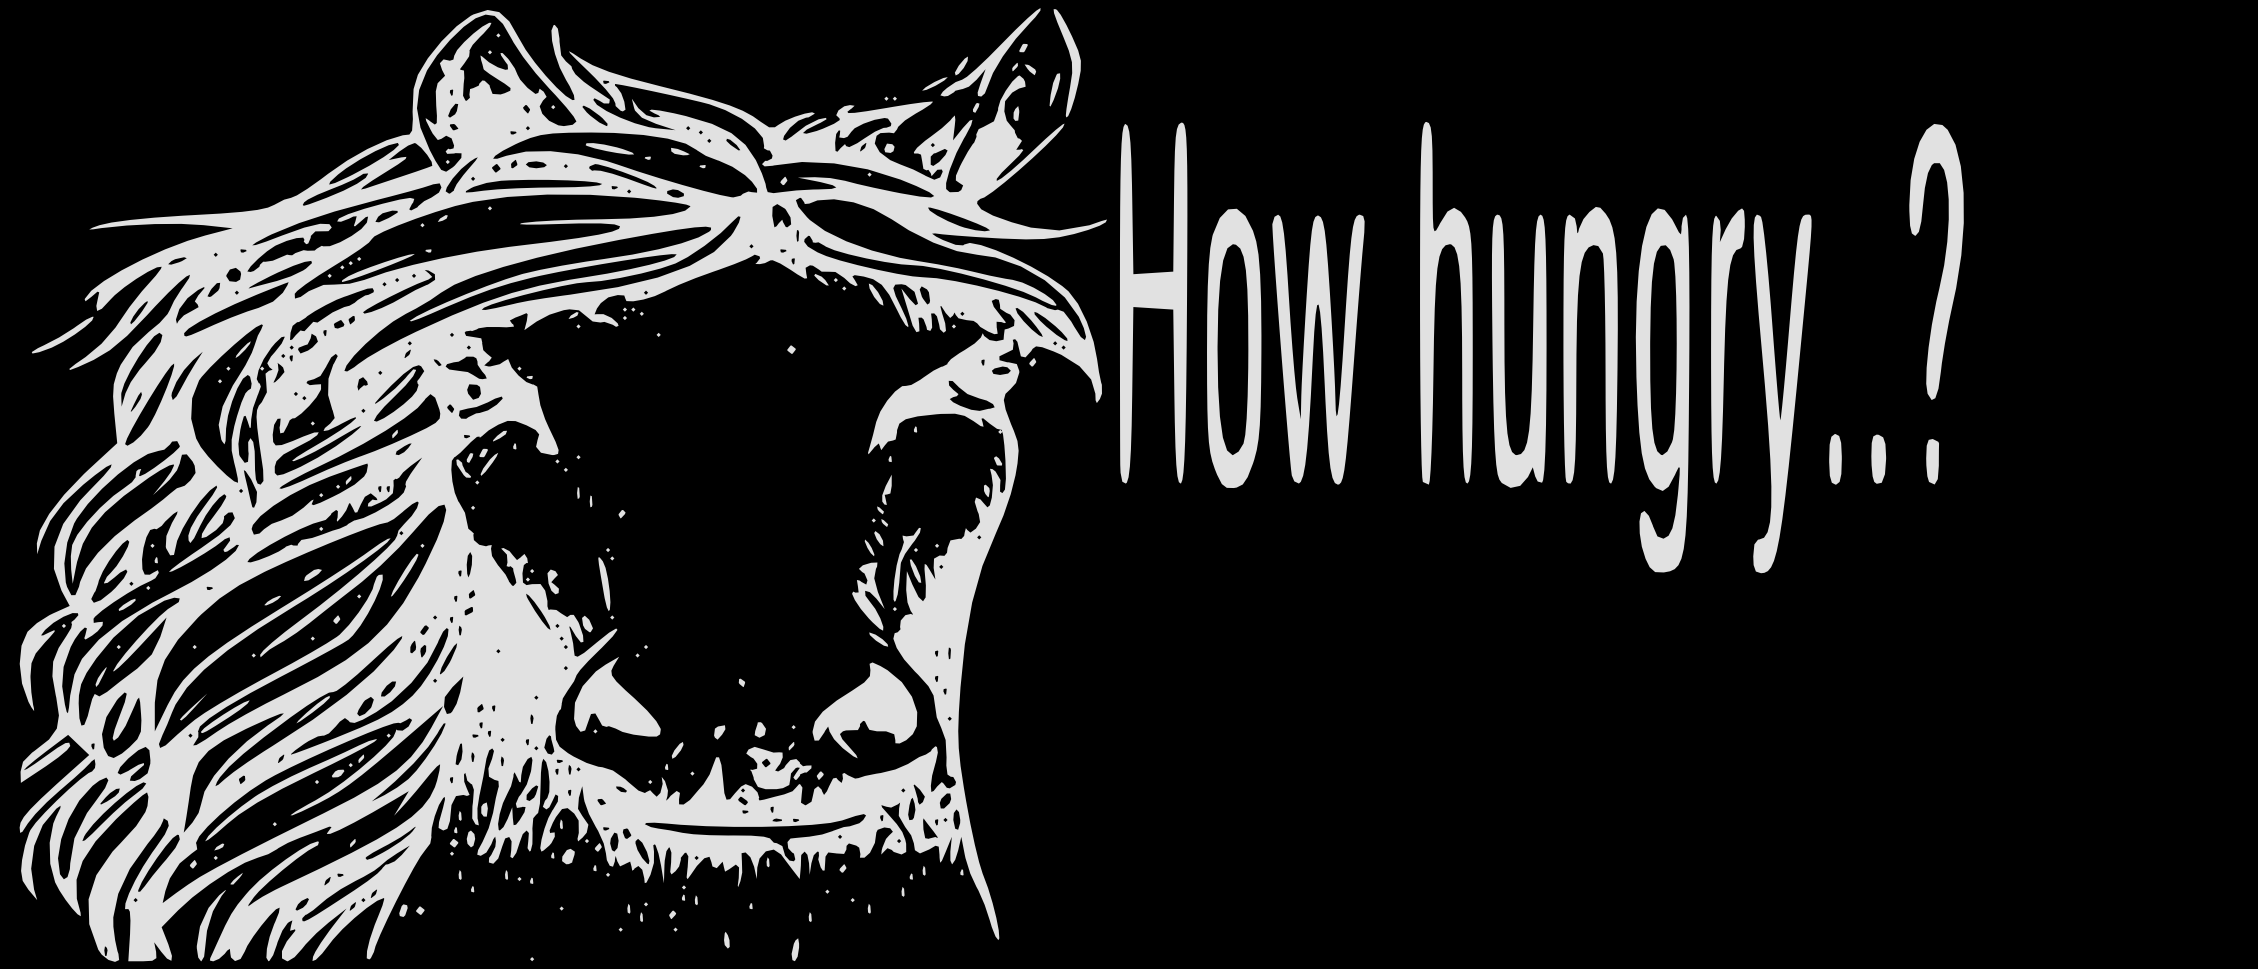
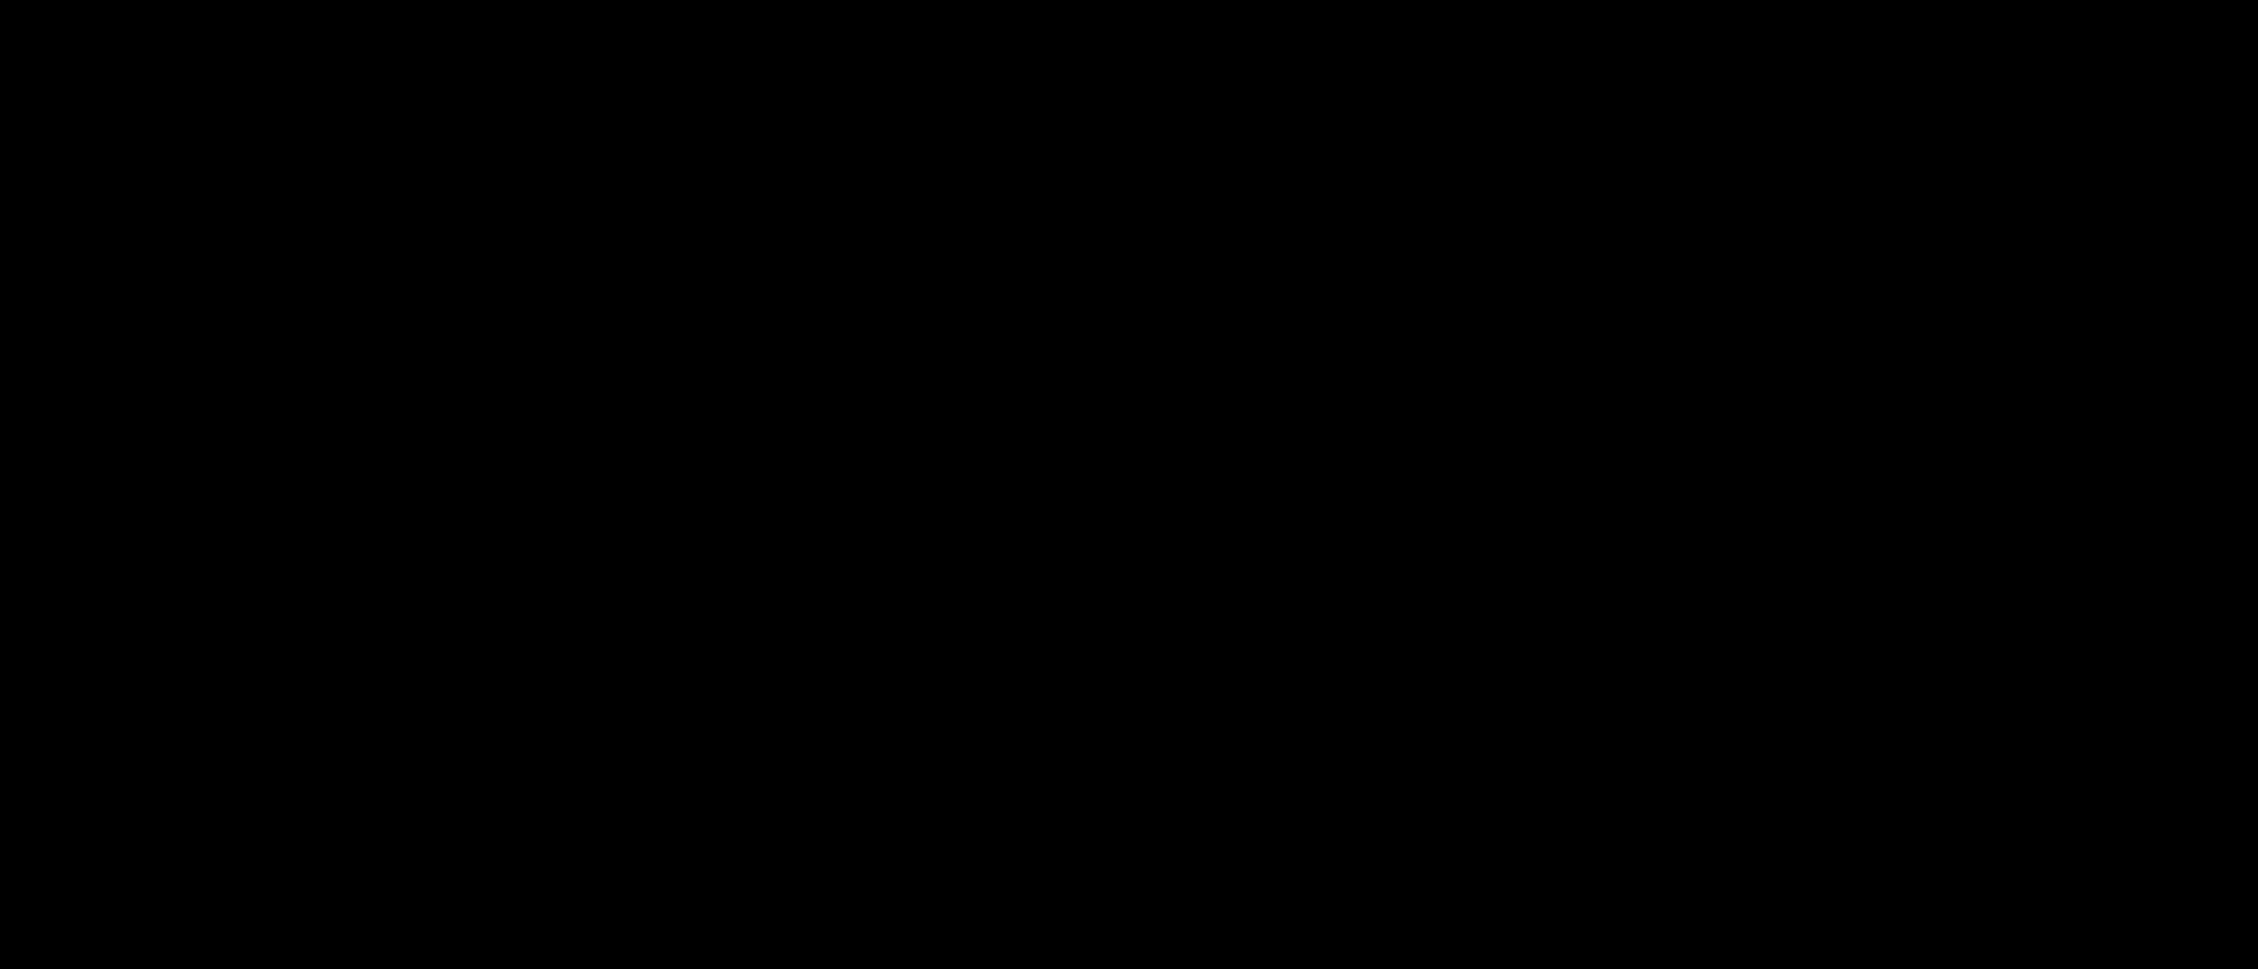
drawing: [19, 8, 1964, 962] -> none

